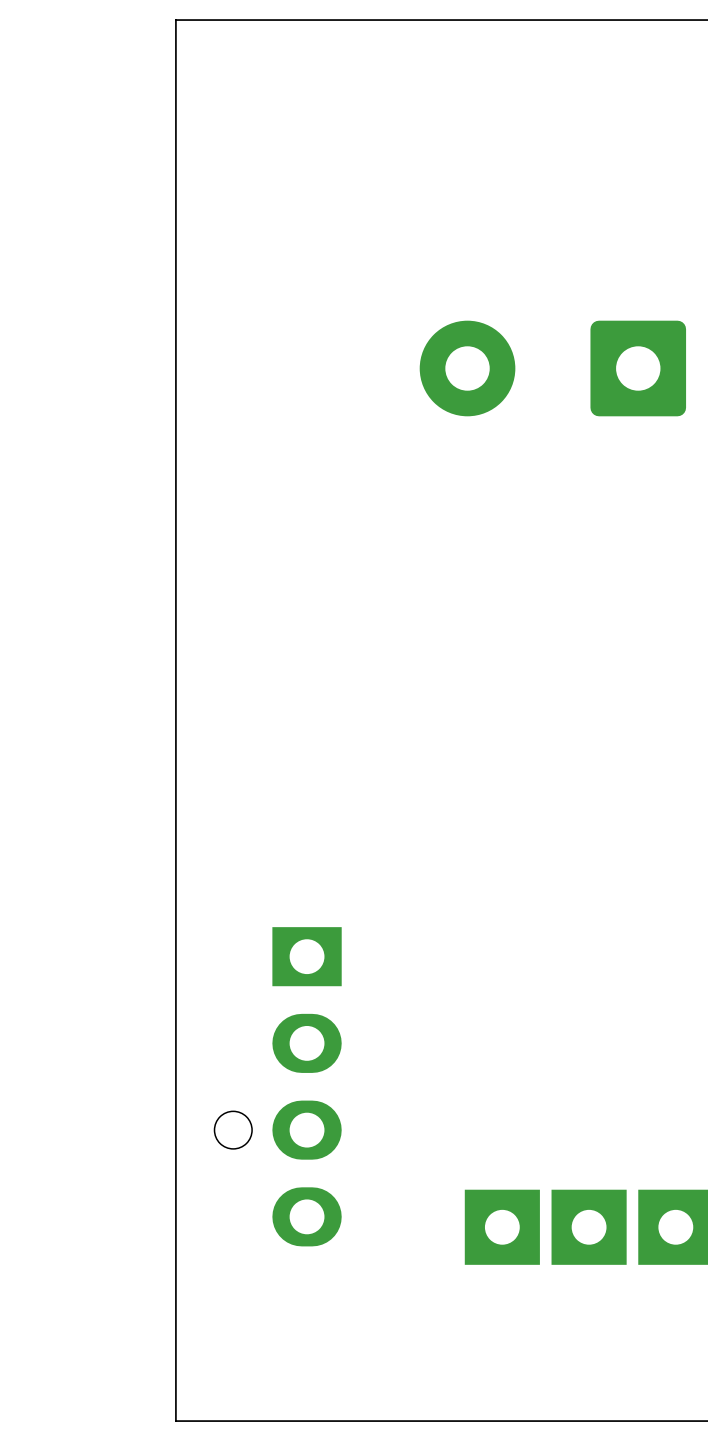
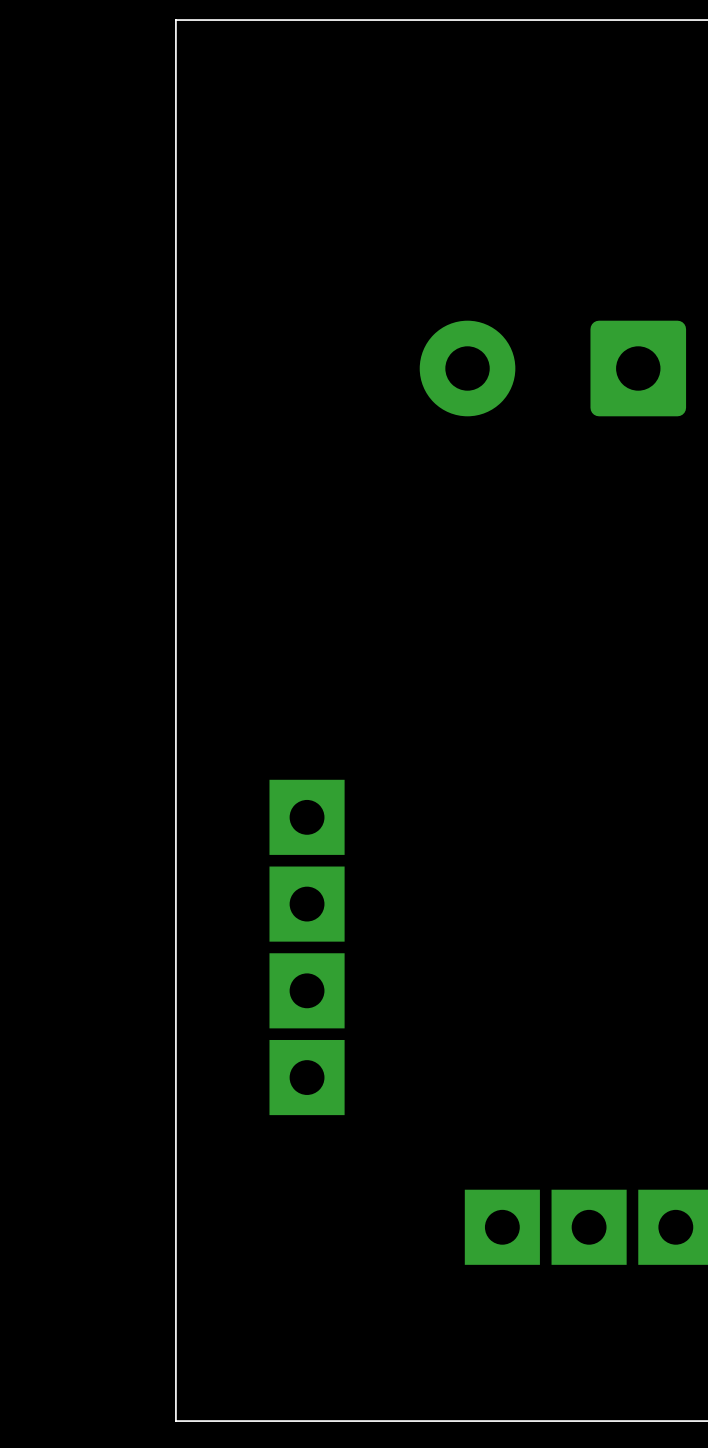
part: none -> (307, 947)
part: (278, 1086) -> none

